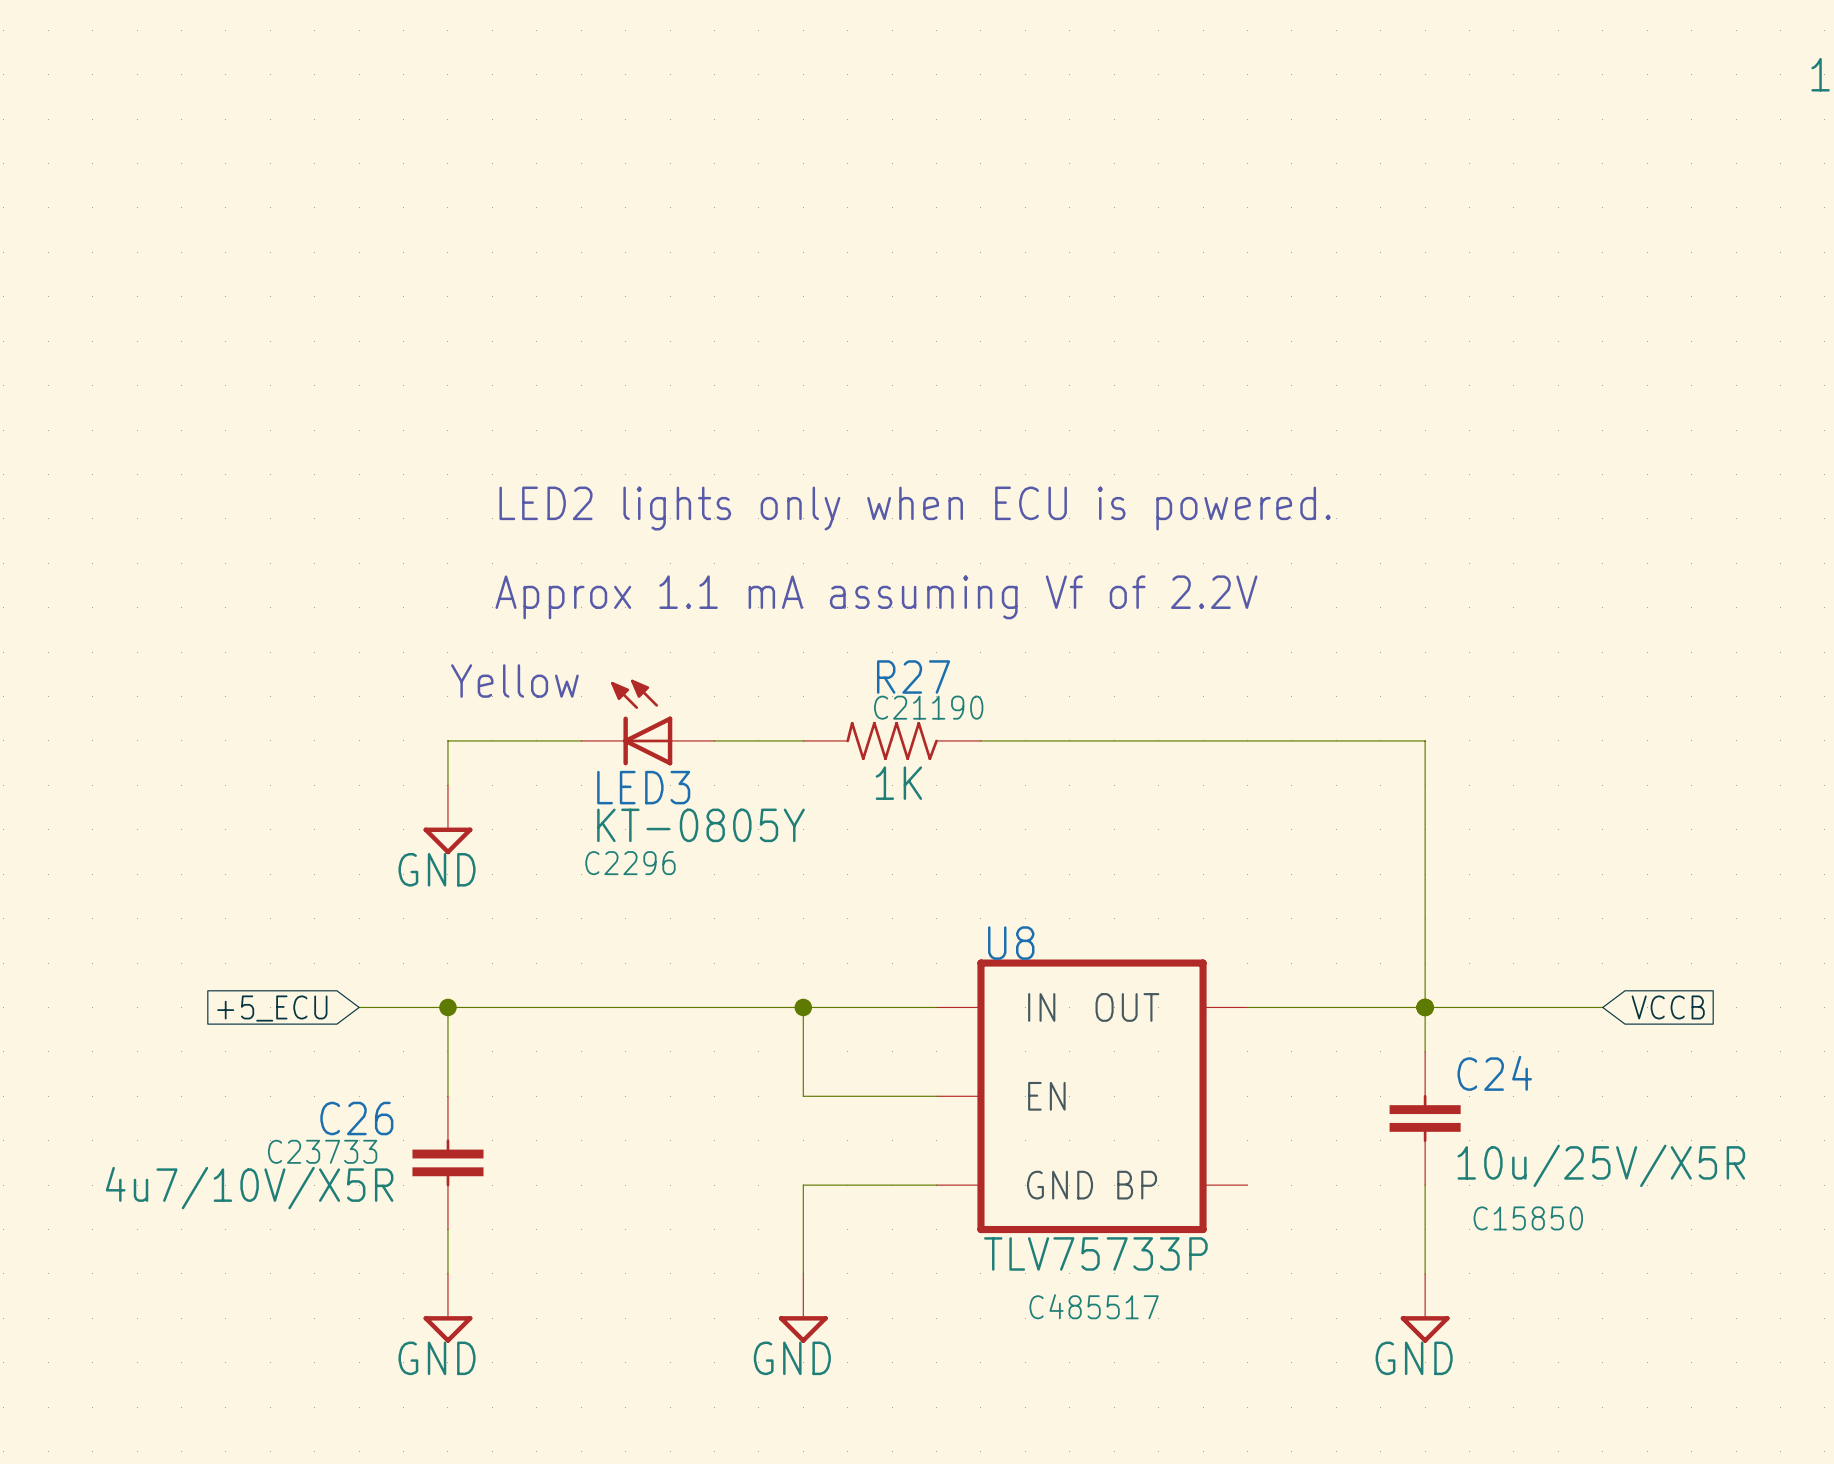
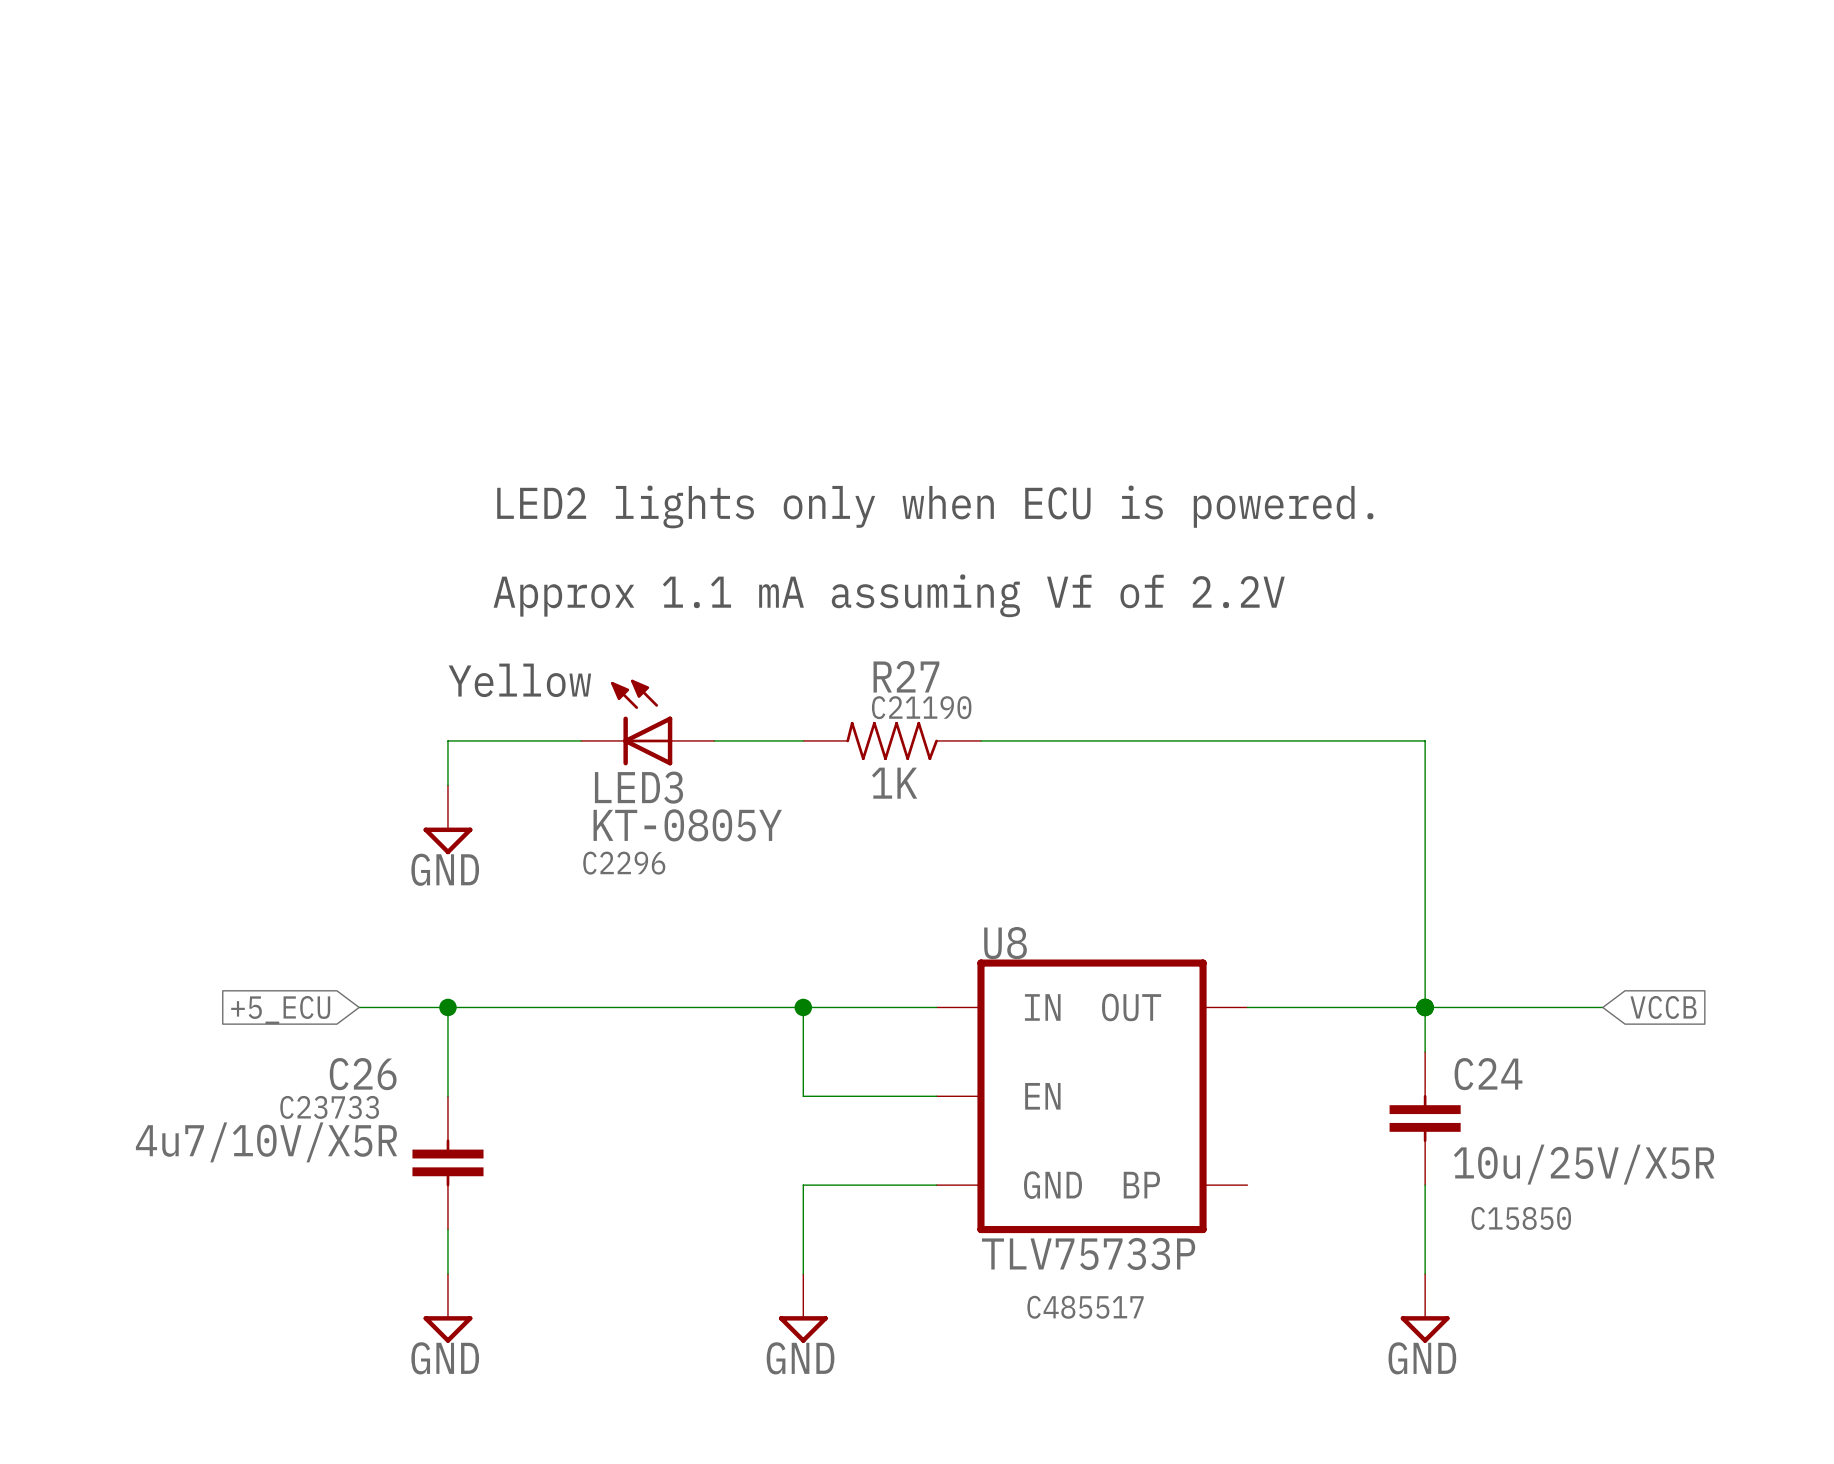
C26 name position: C26 (356, 1118) -> C26 (363, 1074)
C26 text position: C23733 (322, 1151) -> C23733 (329, 1107)
C26 value position: 4u7/10V/X5R (249, 1188) -> 4u7/10V/X5R (266, 1142)

